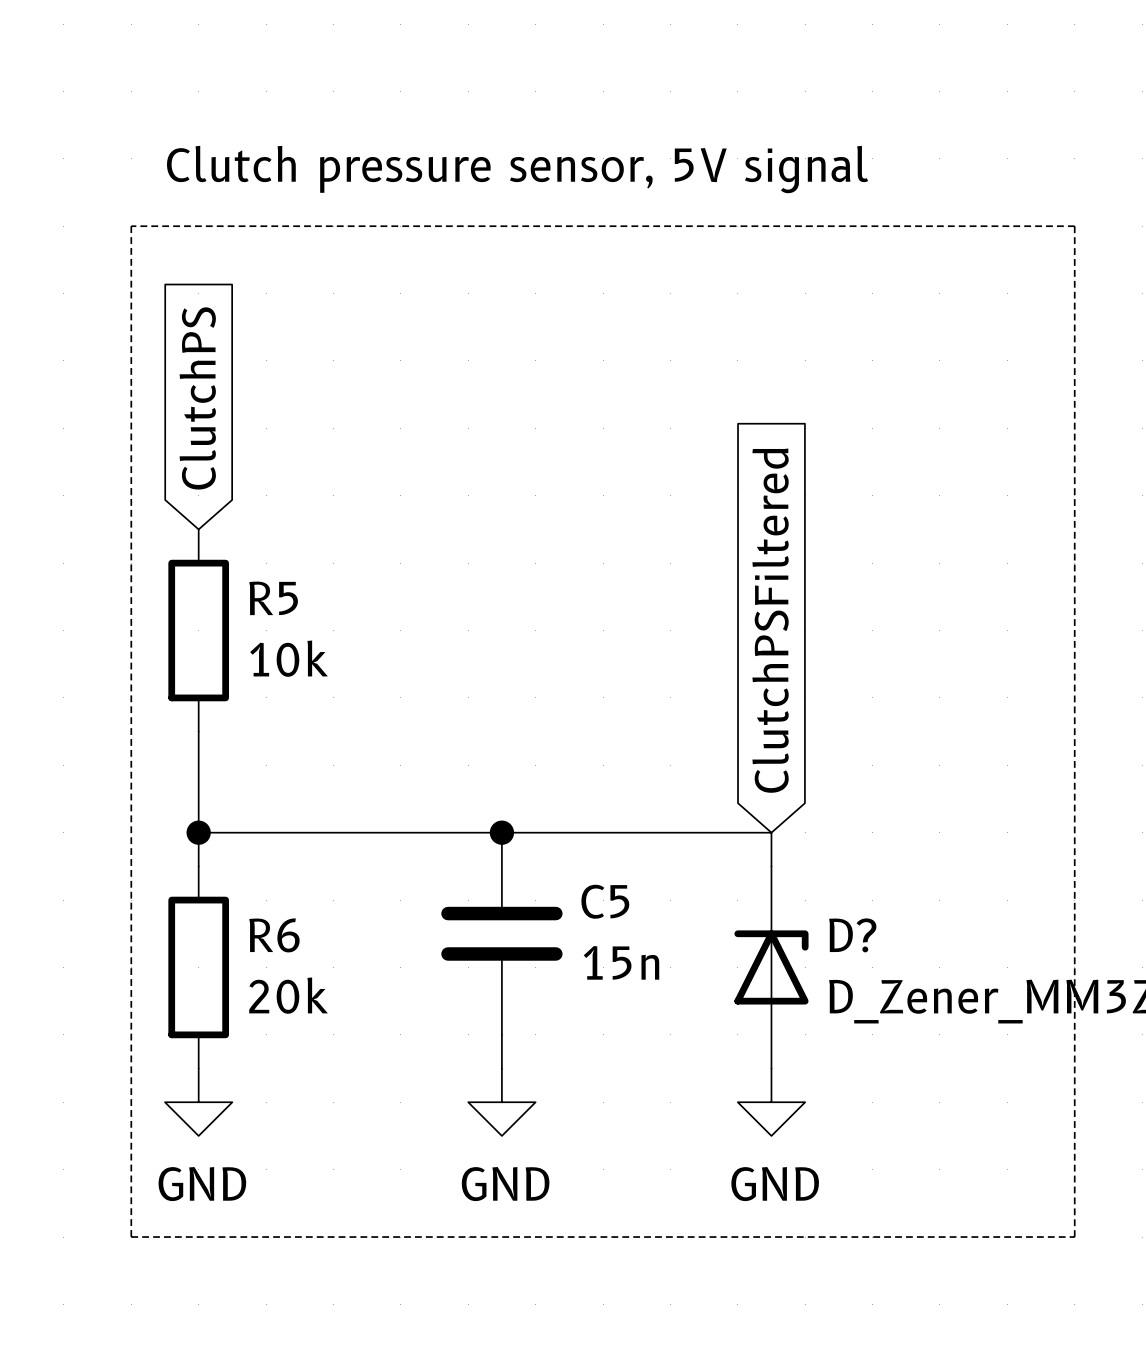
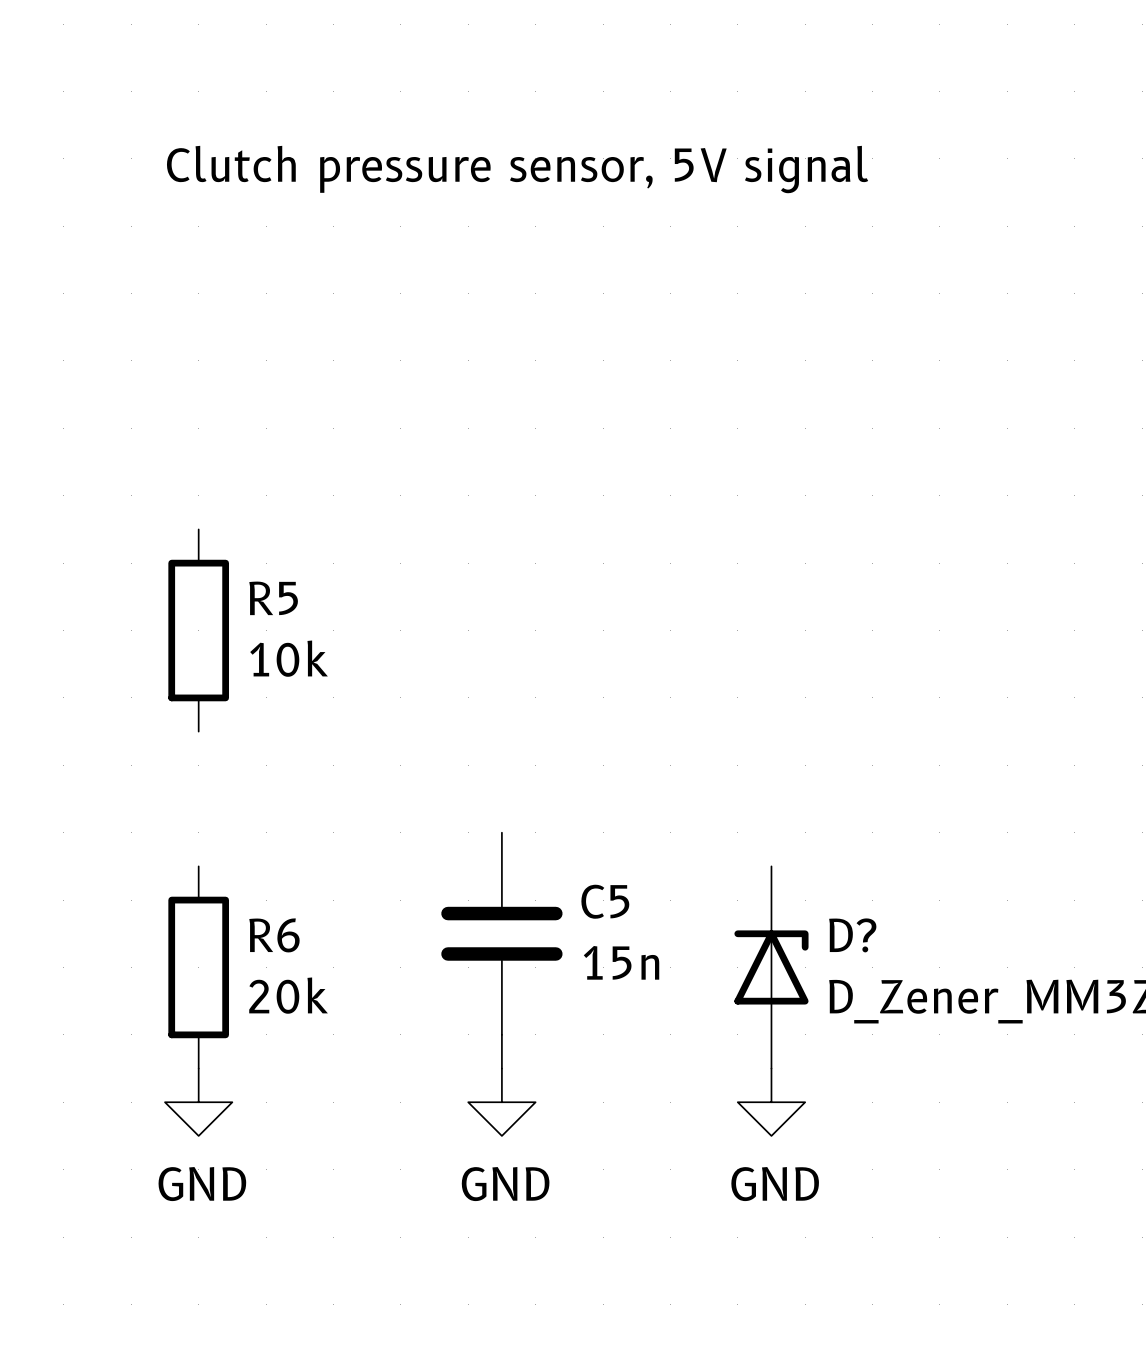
line: (131, 226) (1074, 226) (1074, 1237) (131, 1237) (131, 226) -> none
global label: ClutchPS (197, 398) -> none
global label: ClutchPSFiltered (770, 620) -> none
wire: (198, 731) (198, 866) -> none
wire: (198, 832) (771, 832) (771, 866) -> none
junction: (198, 832) -> none
junction: (501, 832) -> none

